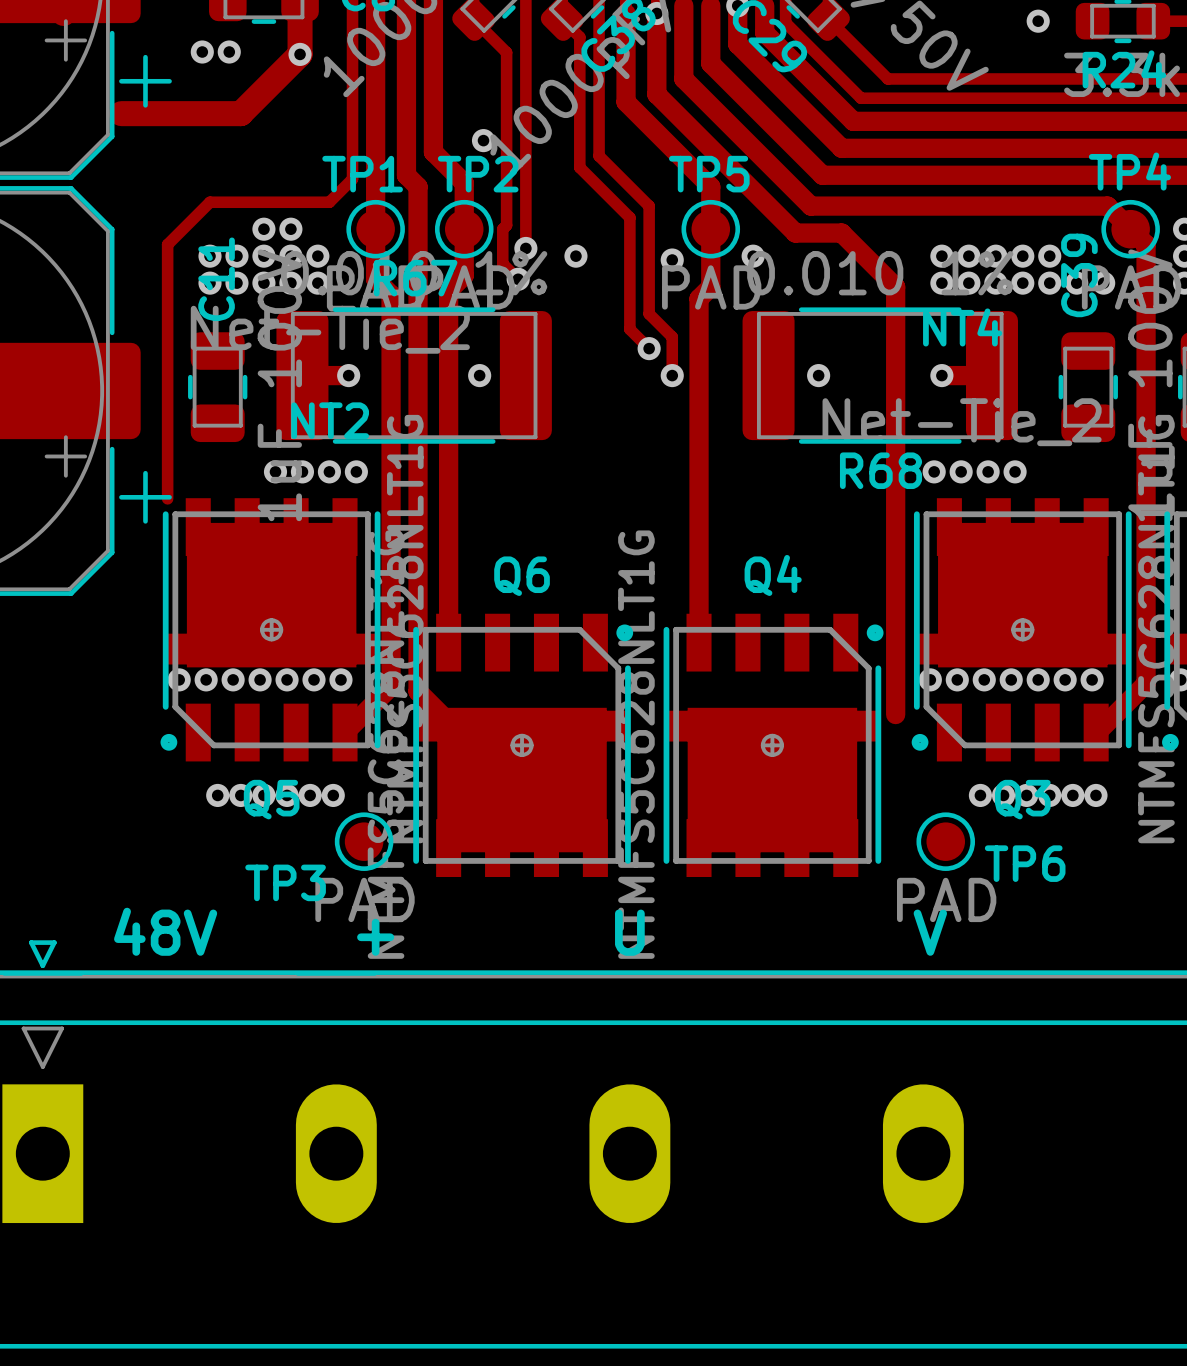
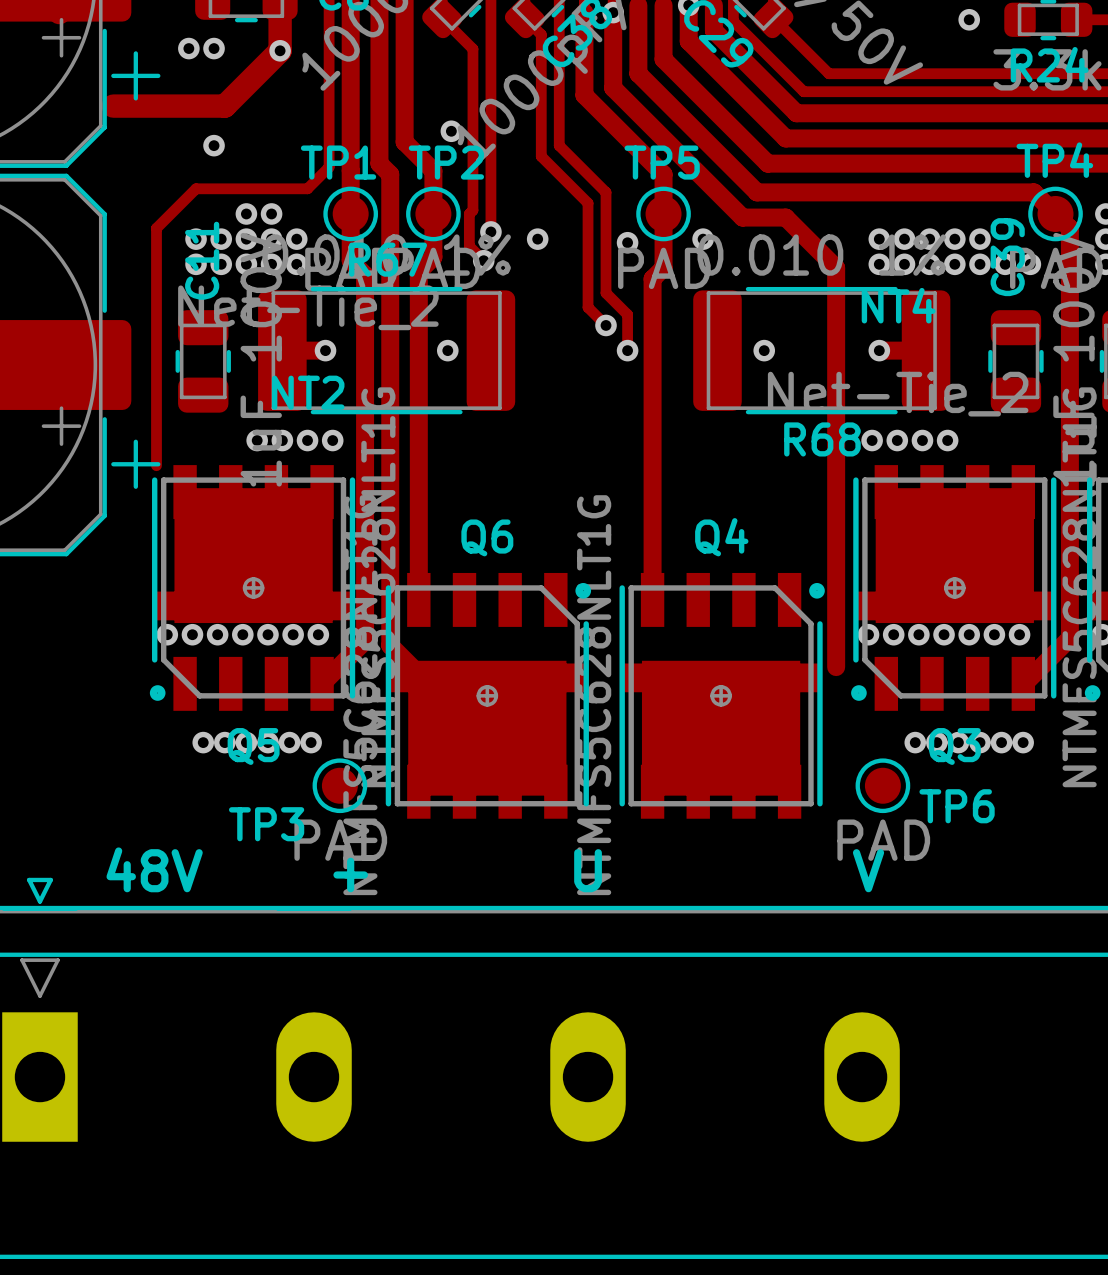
via: none -> (214, 145)

